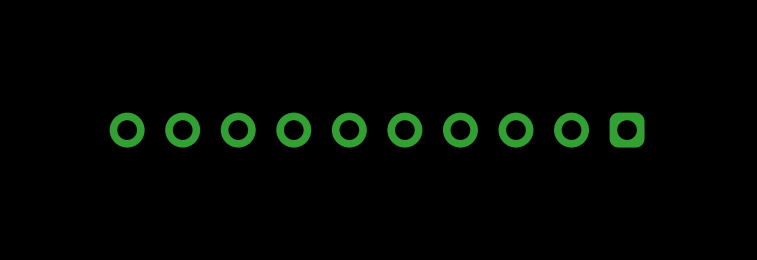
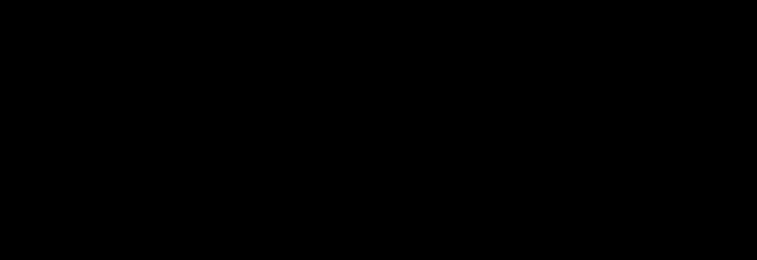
part: (377, 130) -> none

